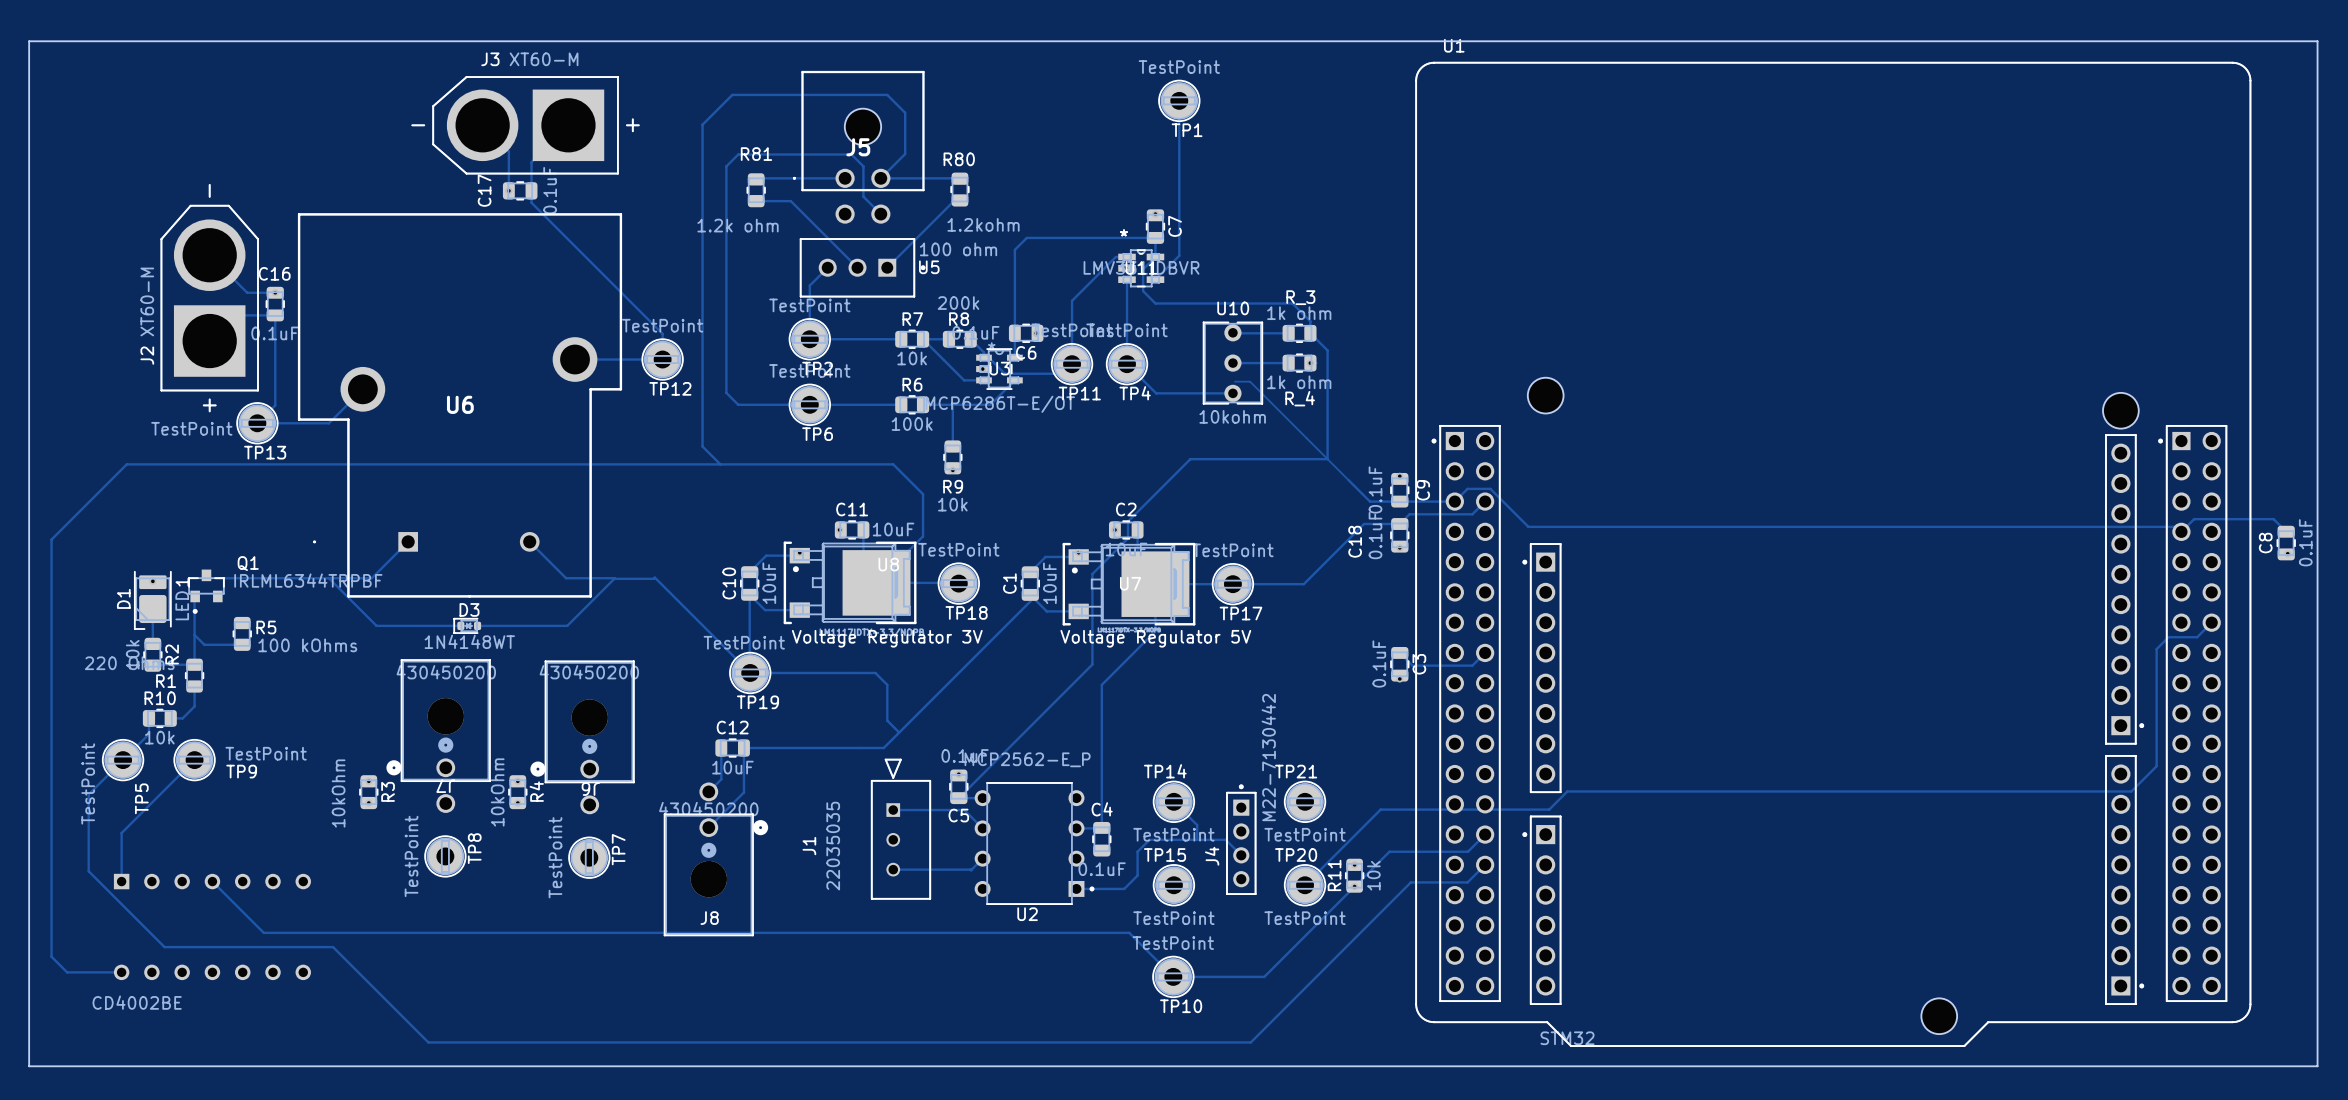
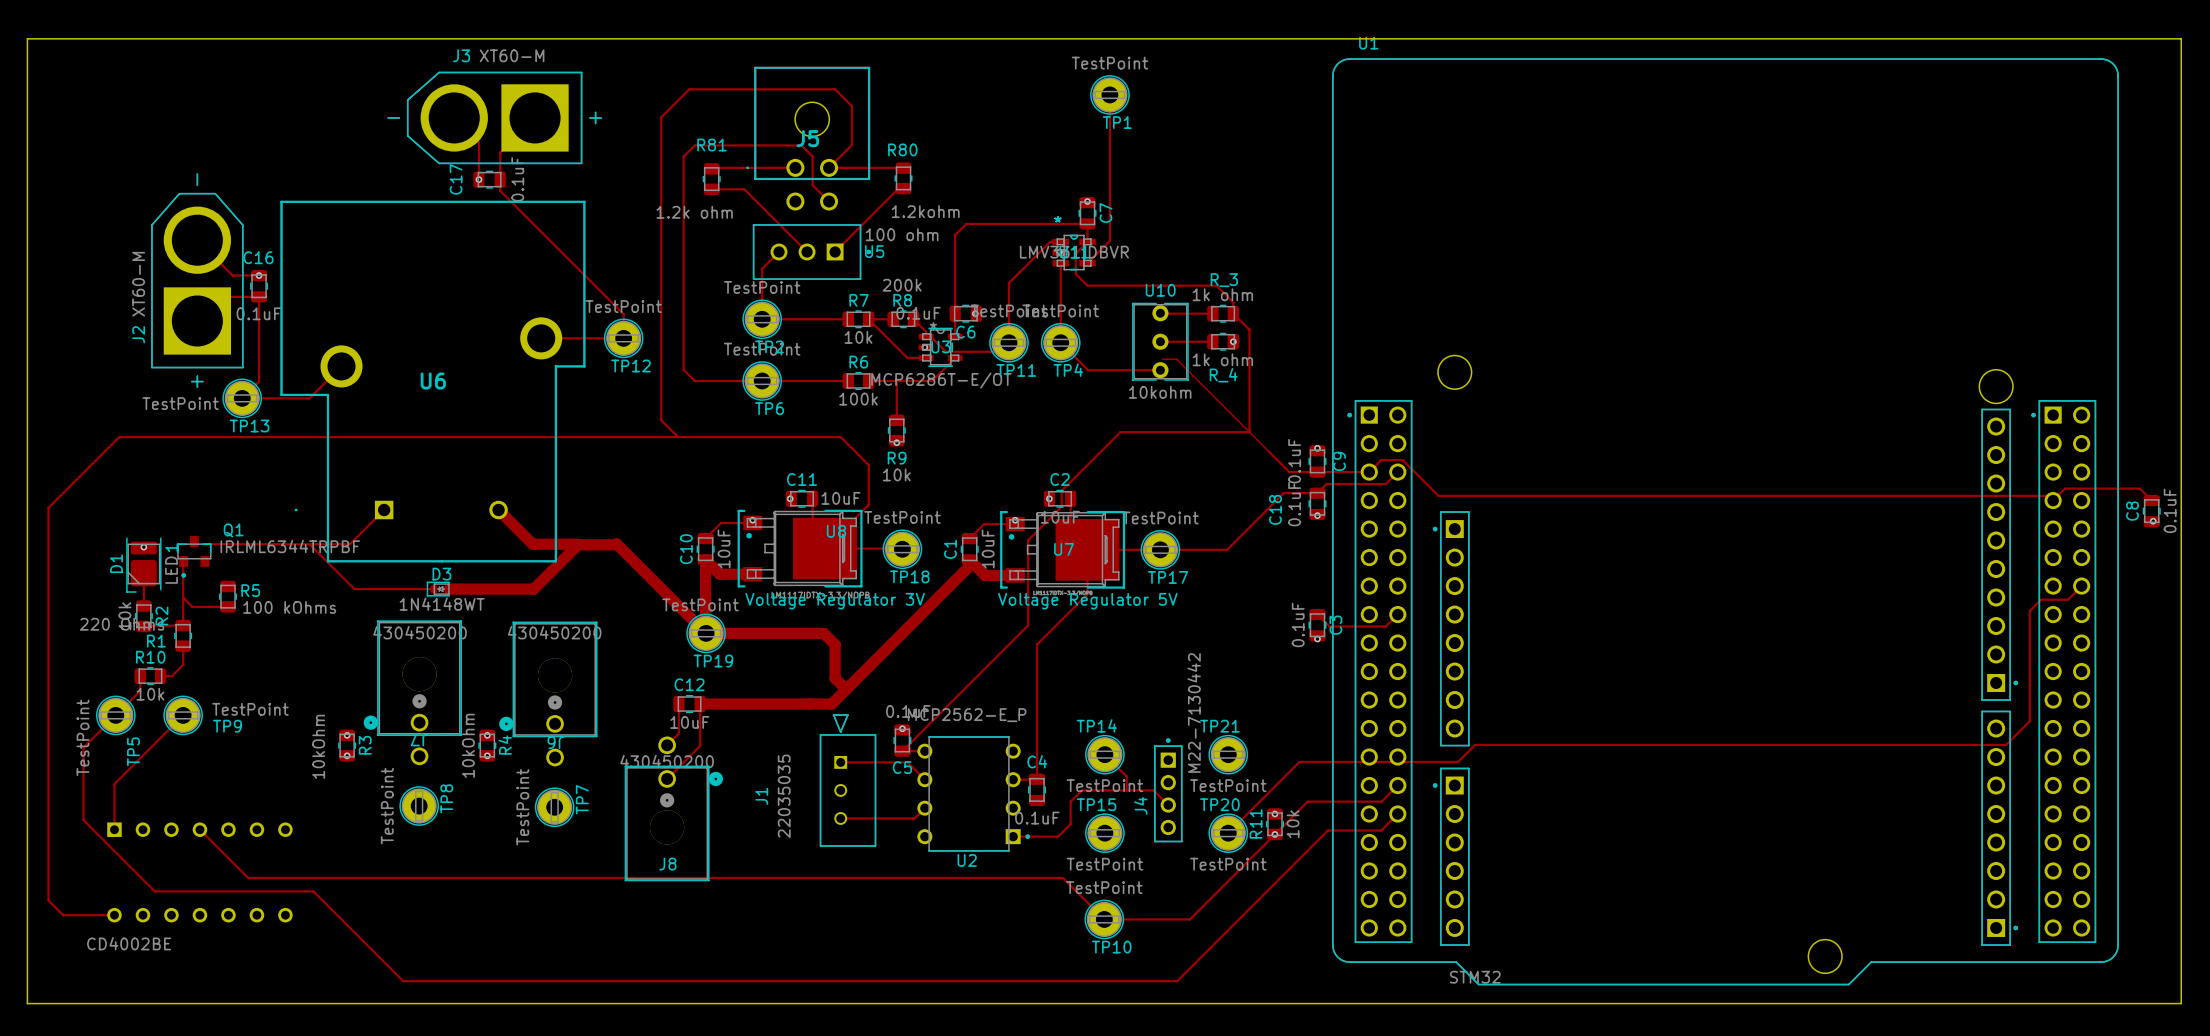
track width: thin (529, 541) (566, 578) (614, 578) -> thick (498, 510) (532, 544) (578, 544)
track width: thin (654, 577) (749, 672) (749, 594) (765, 610) (799, 610) -> thick (616, 543) (705, 632) (705, 559) (720, 574) (752, 574)
track width: thin (653, 578) (614, 578) (567, 625) (477, 625) -> thick (615, 544) (578, 544) (533, 589) (449, 589)
track width: thin (1030, 594) (1046, 611) (1078, 611) -> thick (969, 559) (985, 575) (1015, 575)
track width: thin (1030, 601) (883, 748) (743, 748) -> thick (969, 566) (831, 704) (700, 704)
track width: thin (750, 672) (875, 672) (887, 684) (887, 720) (899, 732) -> thick (706, 633) (823, 633) (835, 644) (835, 678) (846, 689)

